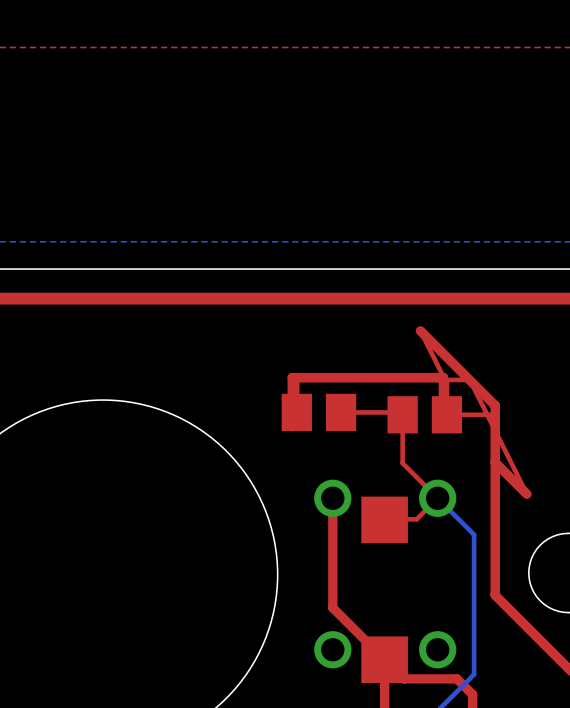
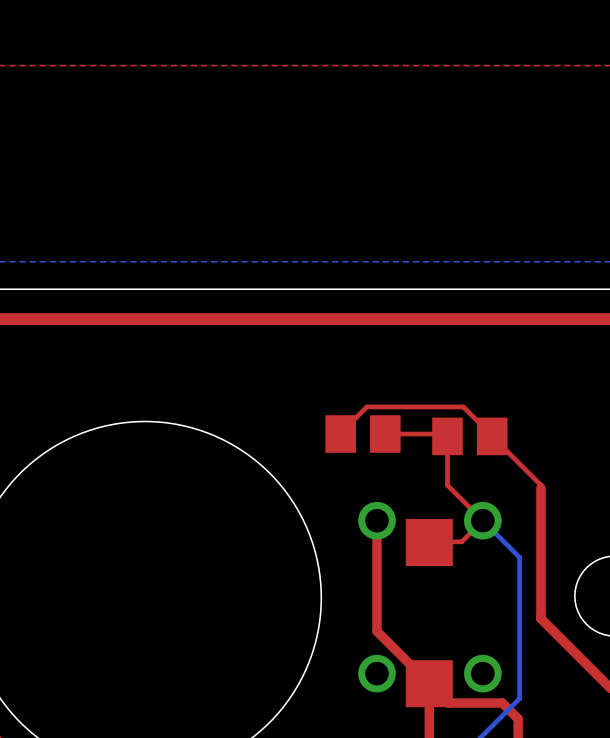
top track: (297, 411) (297, 379) (469, 379) (526, 494) (495, 462) -> (341, 432) (366, 406) (463, 406) (540, 485)
top track: (296, 412) (292, 426) (292, 377) (443, 377) (443, 411) (446, 414) -> none
top track: (446, 414) (495, 414) (495, 463) (495, 405) (420, 330) (446, 383) (446, 414) -> none

